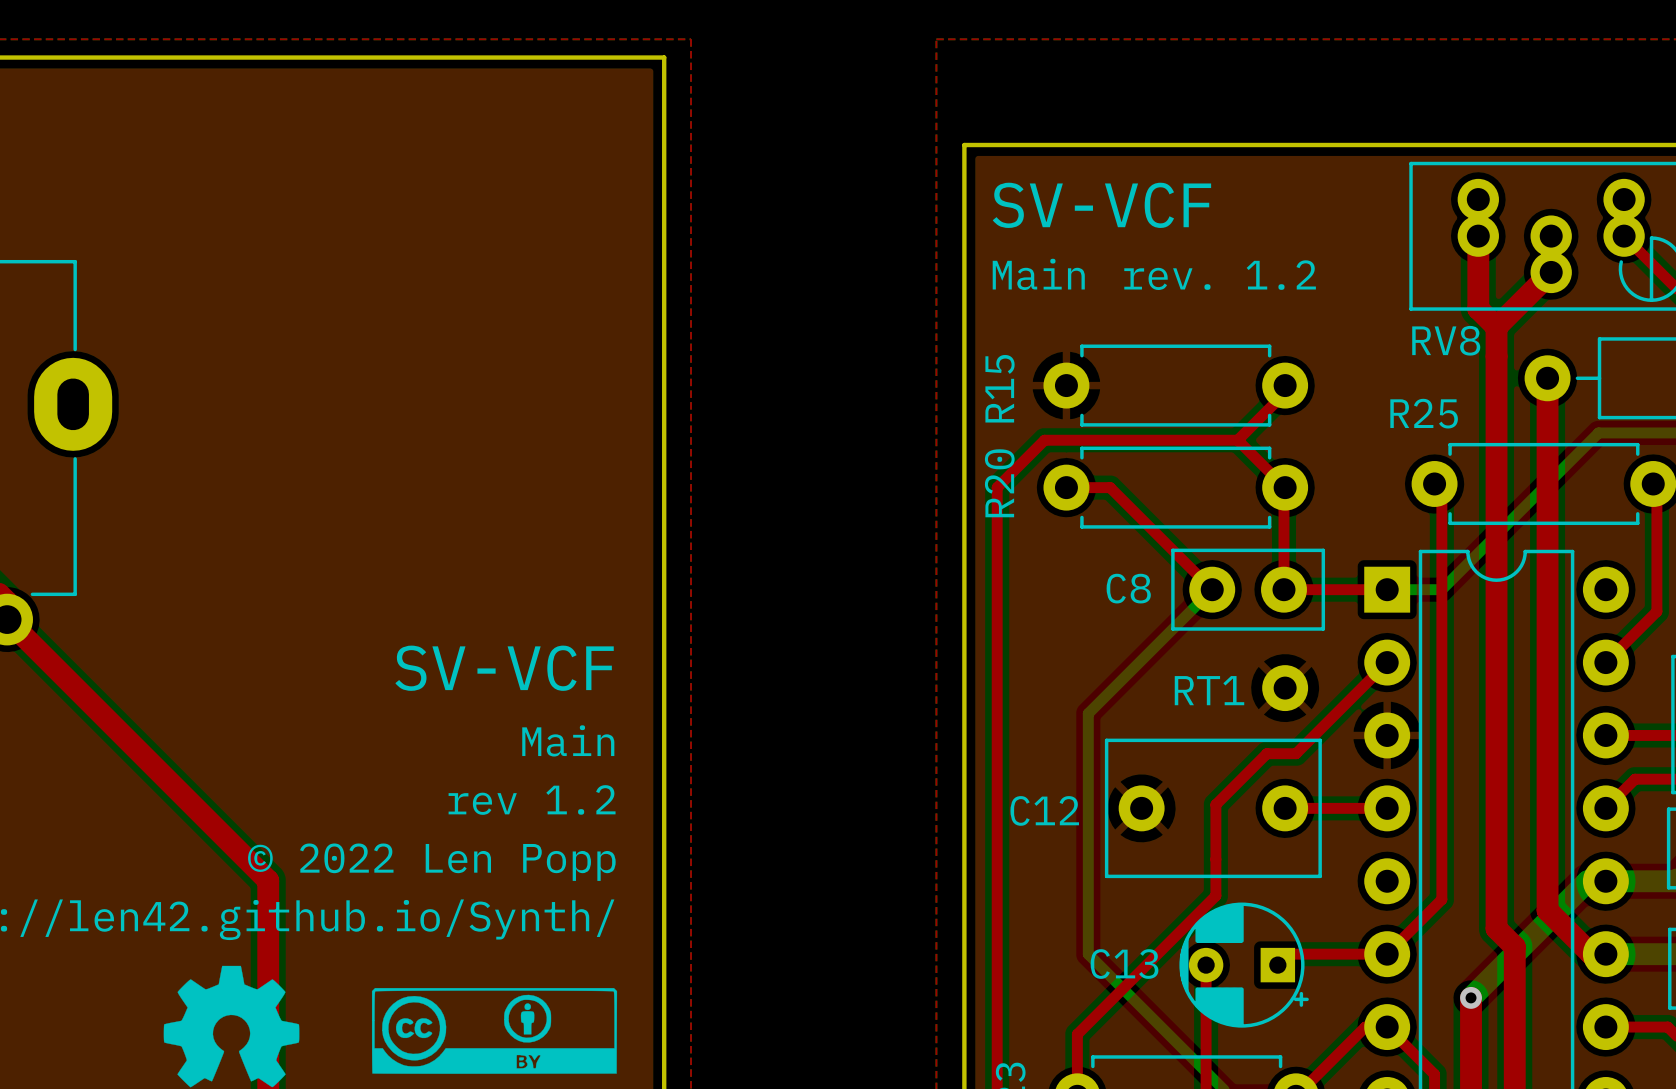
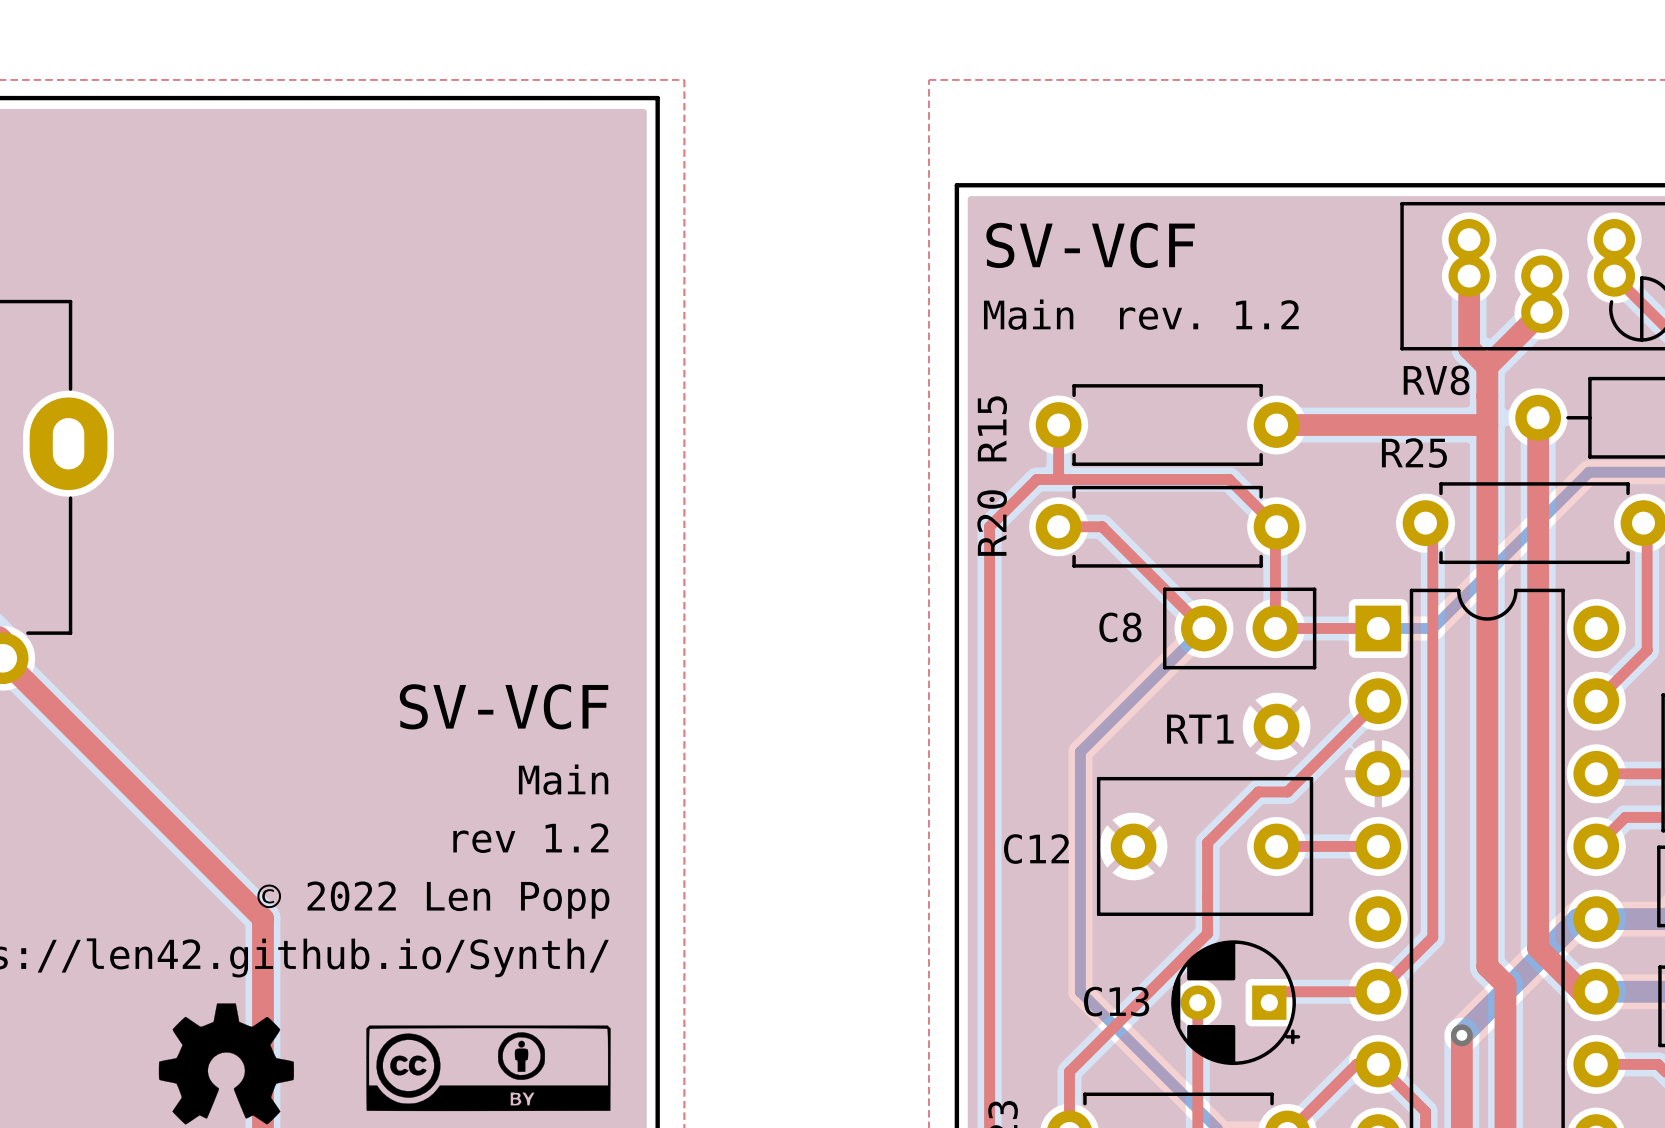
top track: none -> (1058, 425) (1058, 475) (1062, 479)
top track: (1285, 385) (1285, 392) (1237, 440) -> (1276, 425) (1487, 425)

